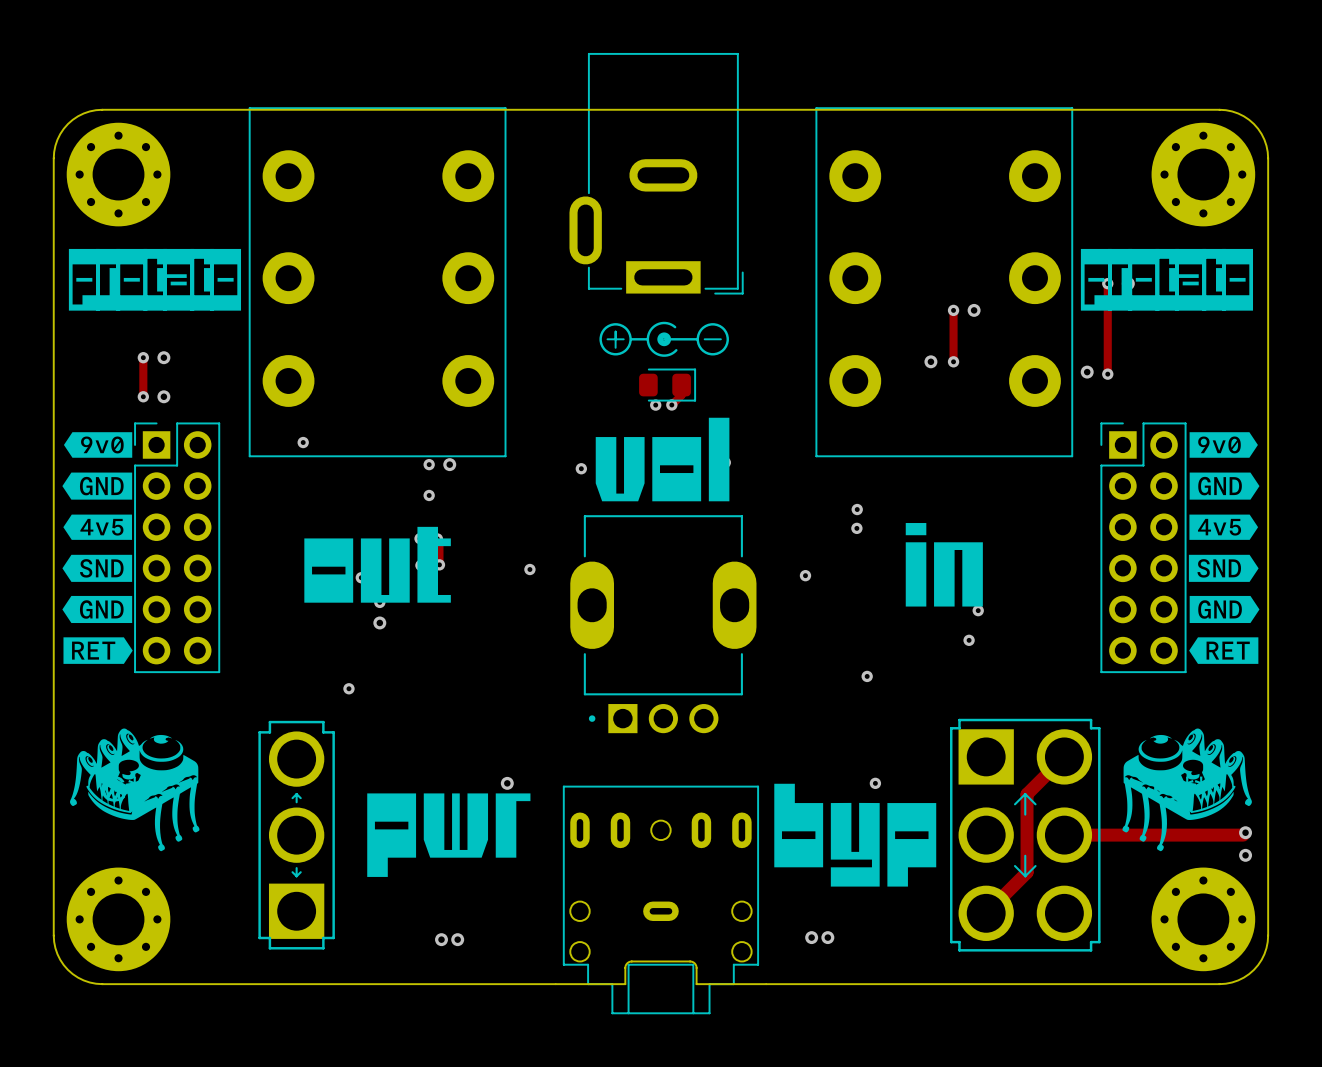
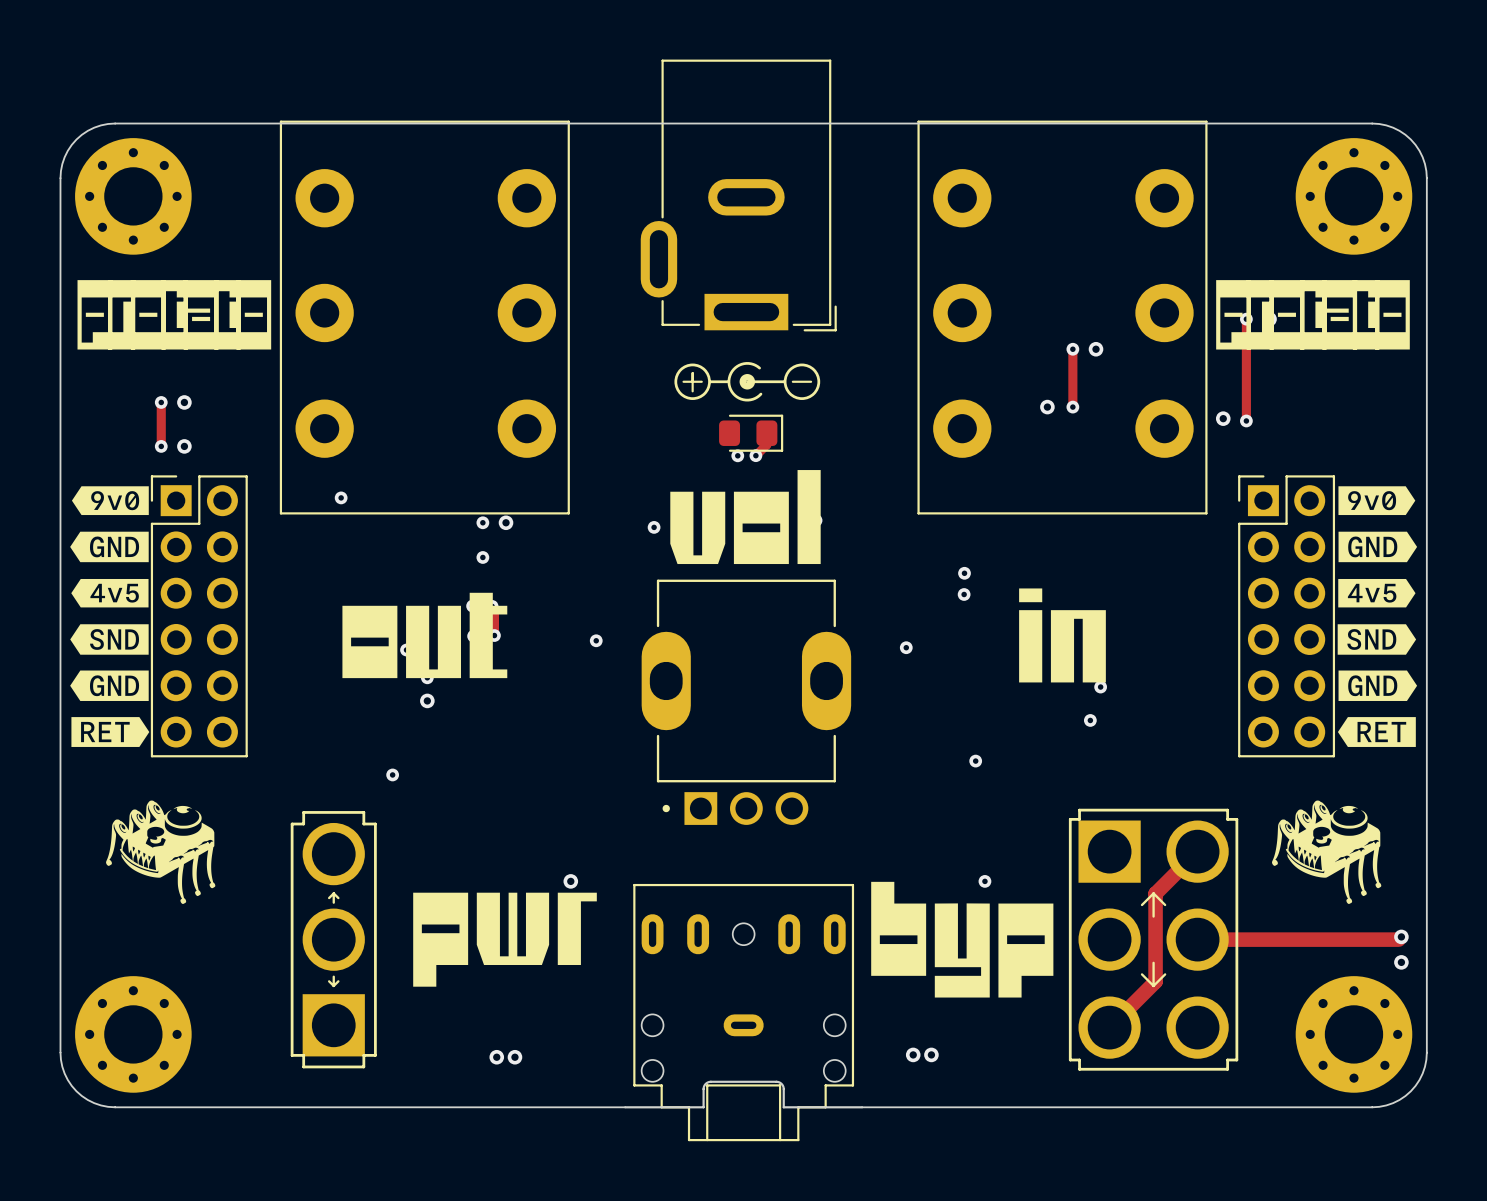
drawing: none -> [106, 800, 216, 904]
drawing: none -> [1272, 800, 1382, 904]
part: (134, 789) -> none
part: (1187, 789) -> none

